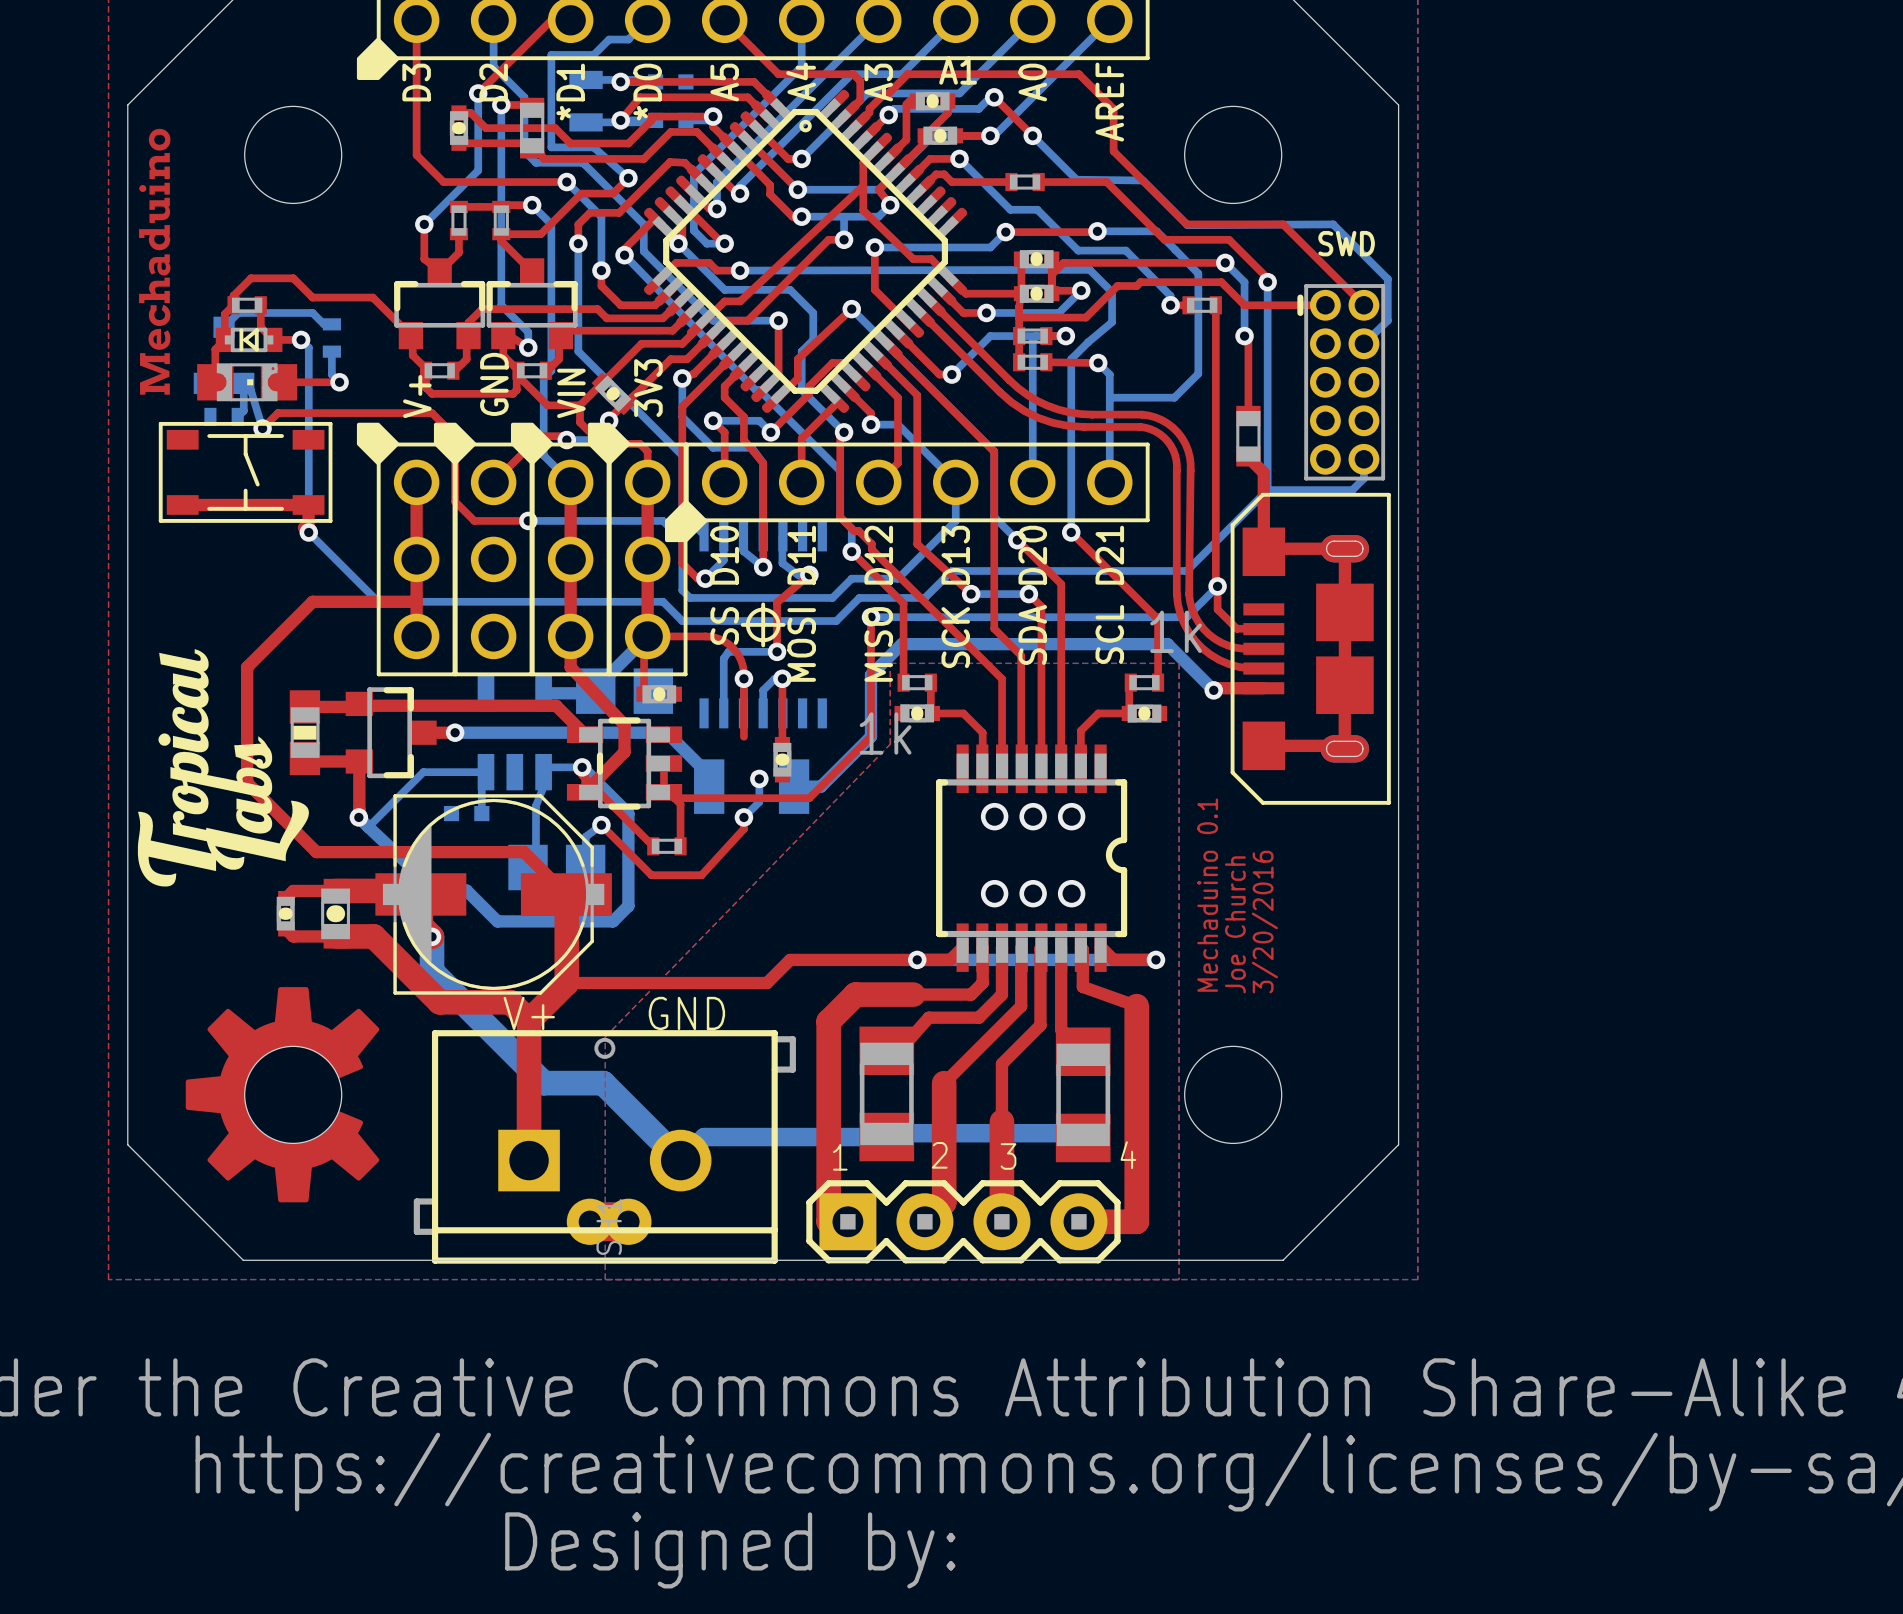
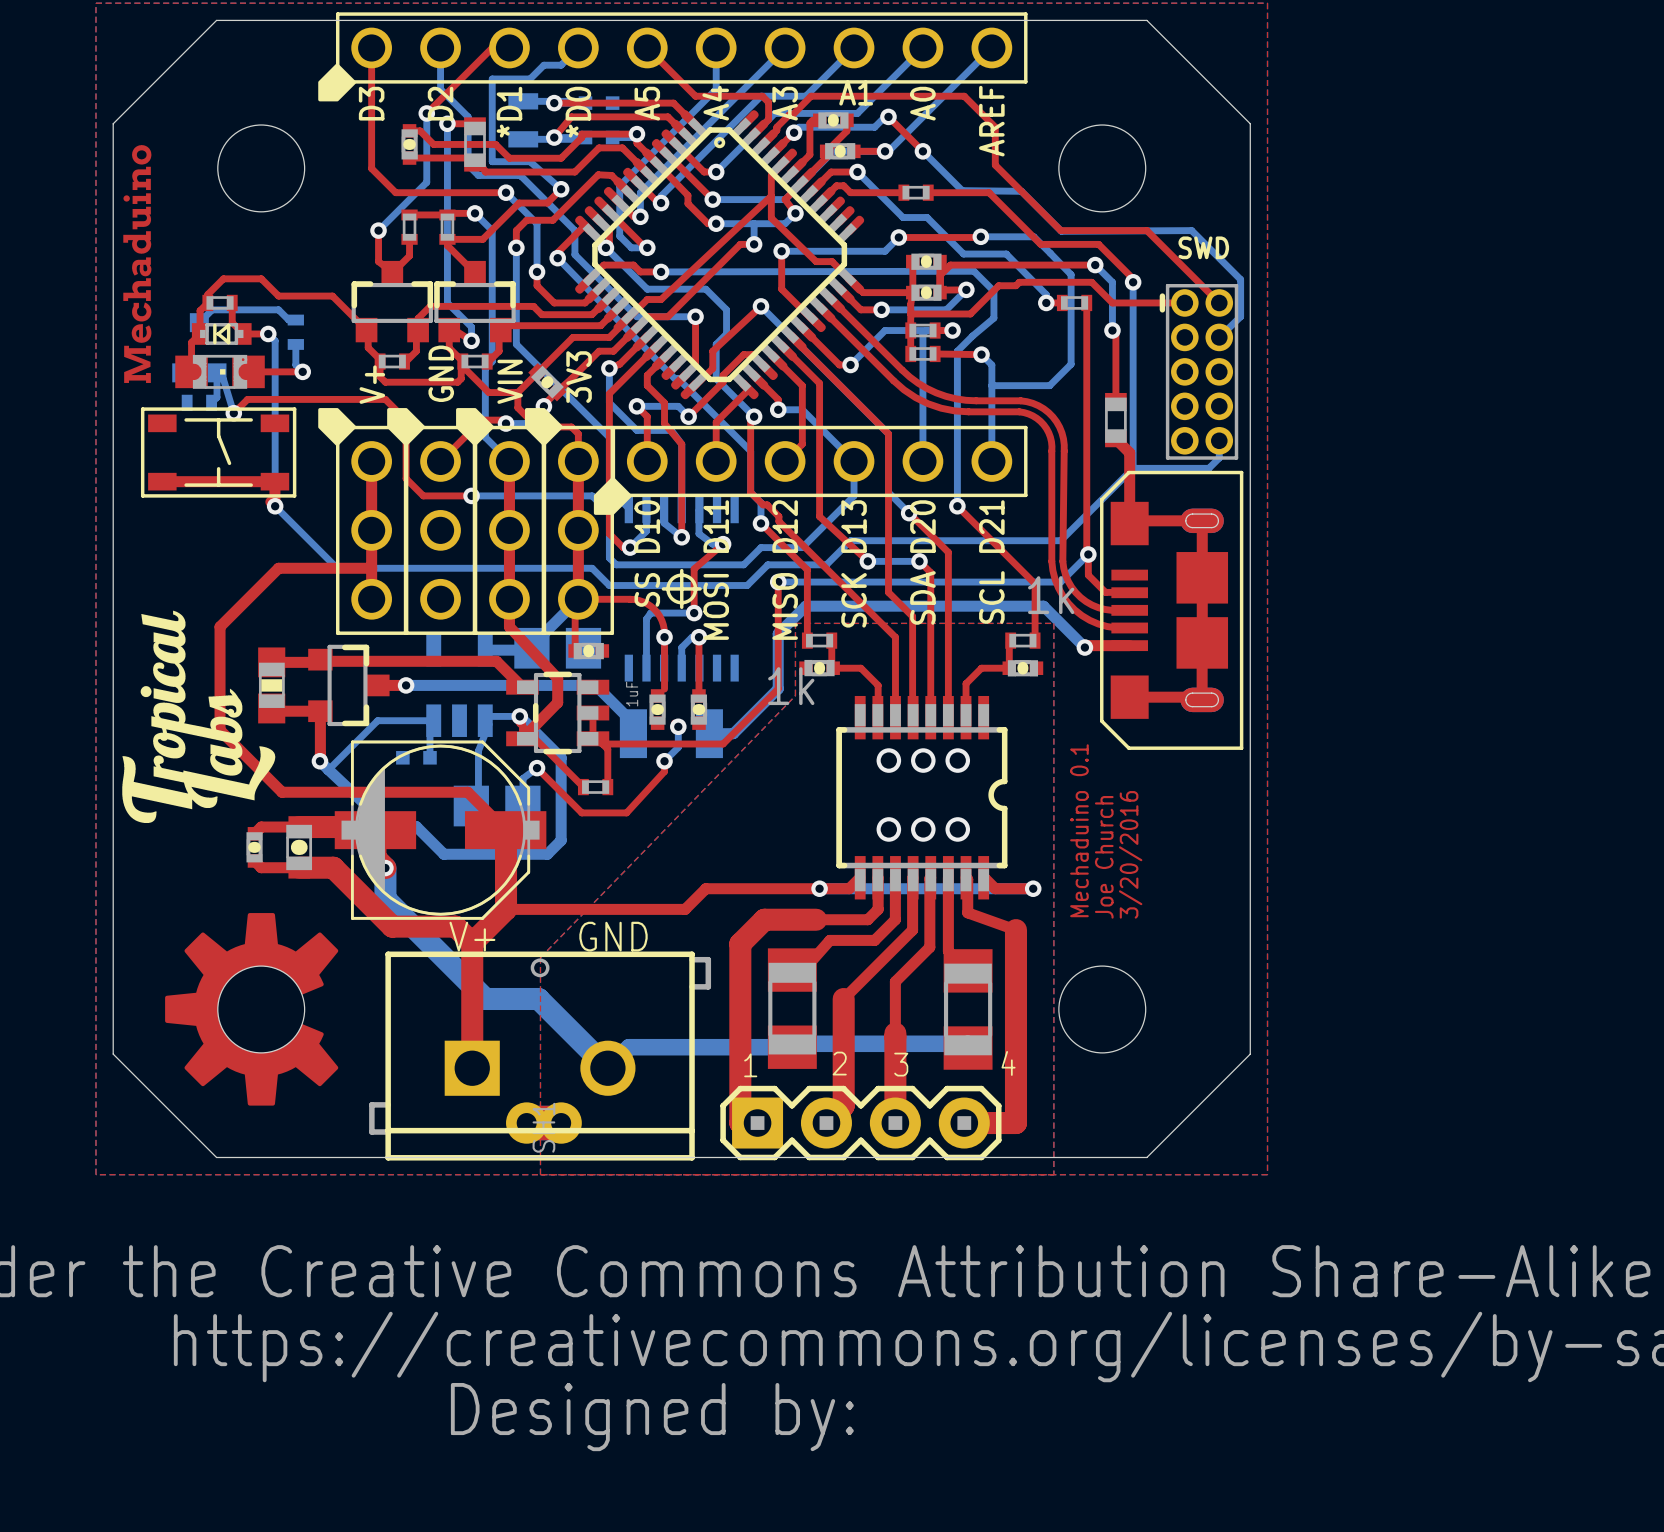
part: none -> 1uF (657, 709)

